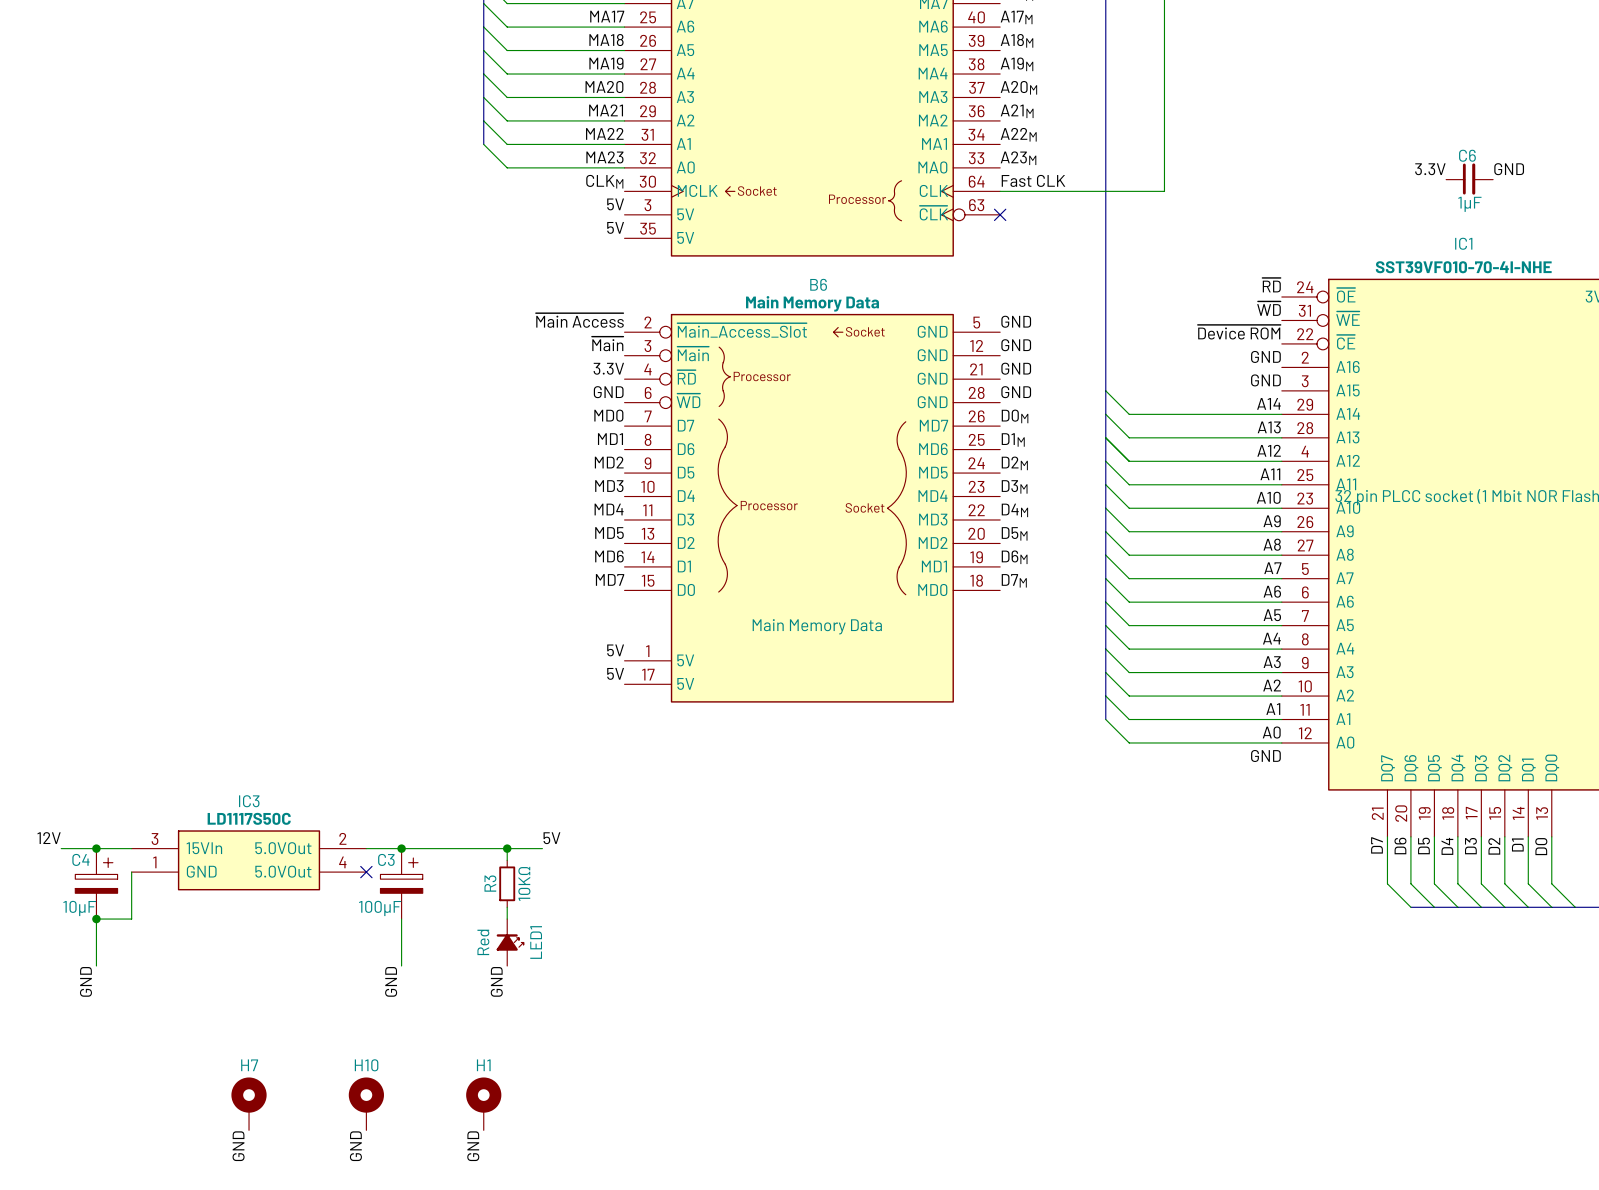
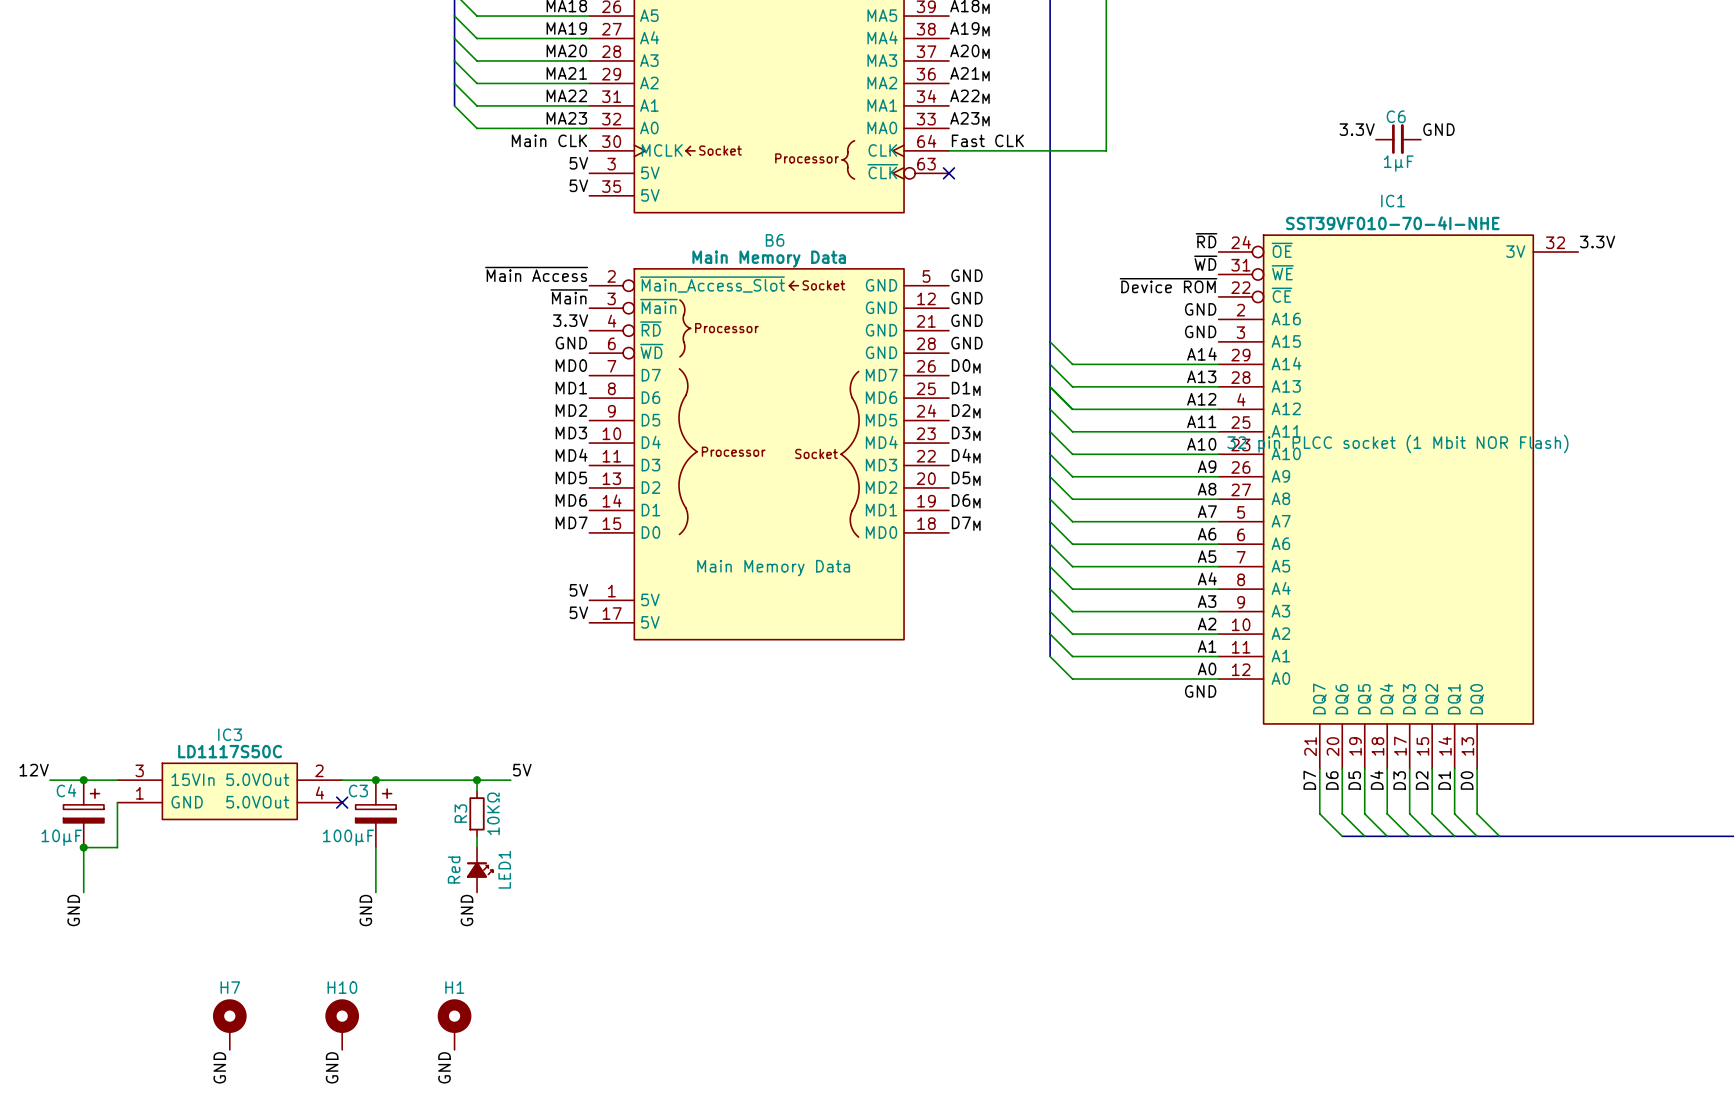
label: CLKM (604, 181) -> Main CLK (549, 140)

